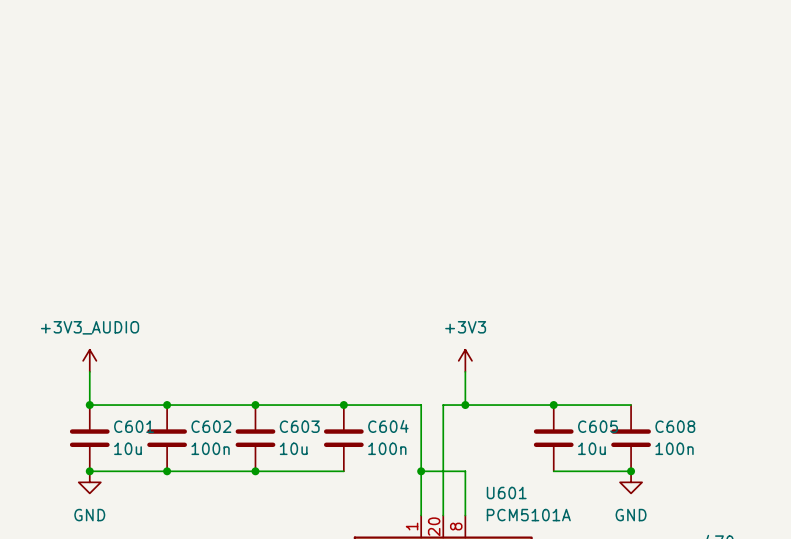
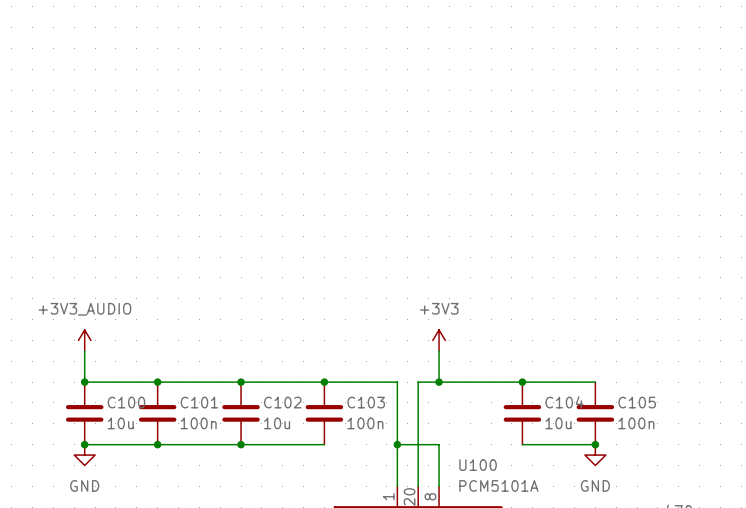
C601 name: C601 (134, 426) -> C100 (126, 402)
C602 name: C602 (211, 426) -> C101 (199, 402)
C603 name: C603 (299, 426) -> C102 (282, 402)
C604 name: C604 (388, 426) -> C103 (366, 402)
C605 name: C605 (598, 426) -> C104 (564, 402)
C608 name: C608 (675, 426) -> C105 (637, 402)
U601 name: U601 (506, 492) -> U100 (478, 465)

